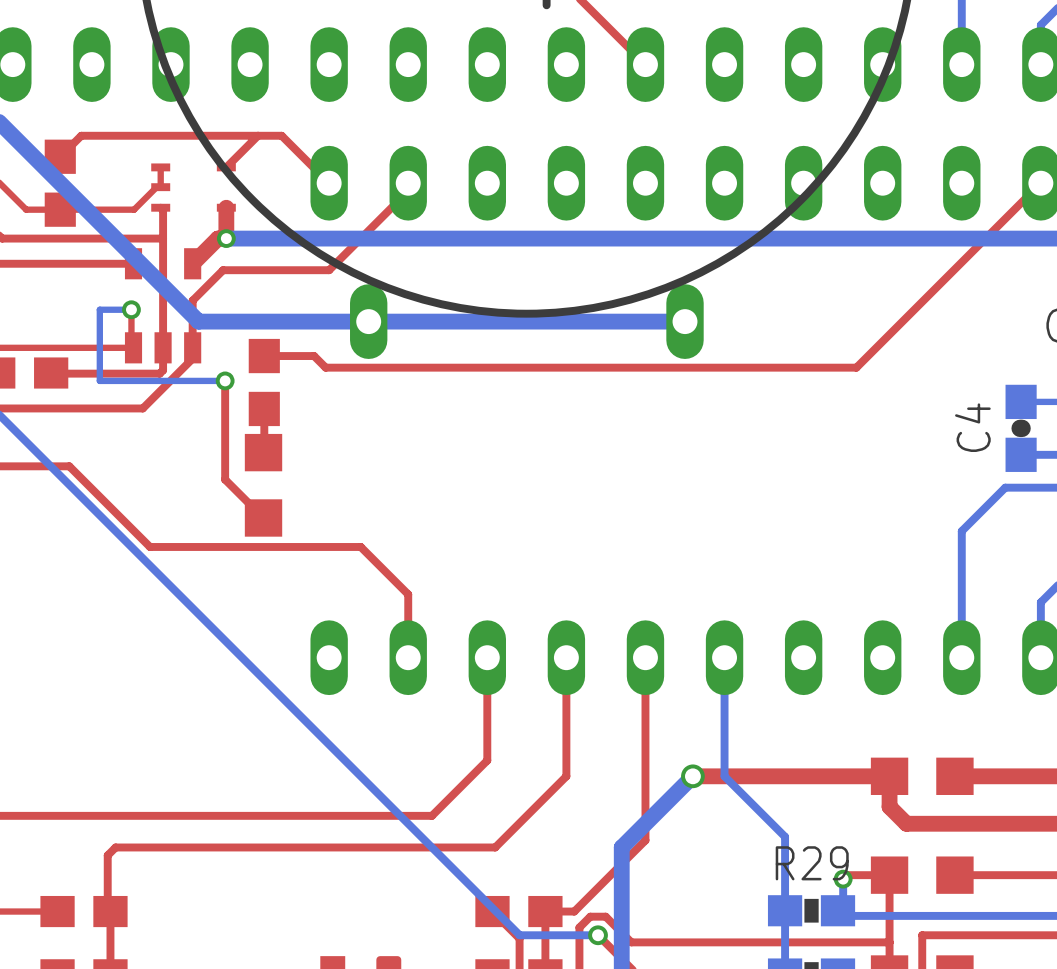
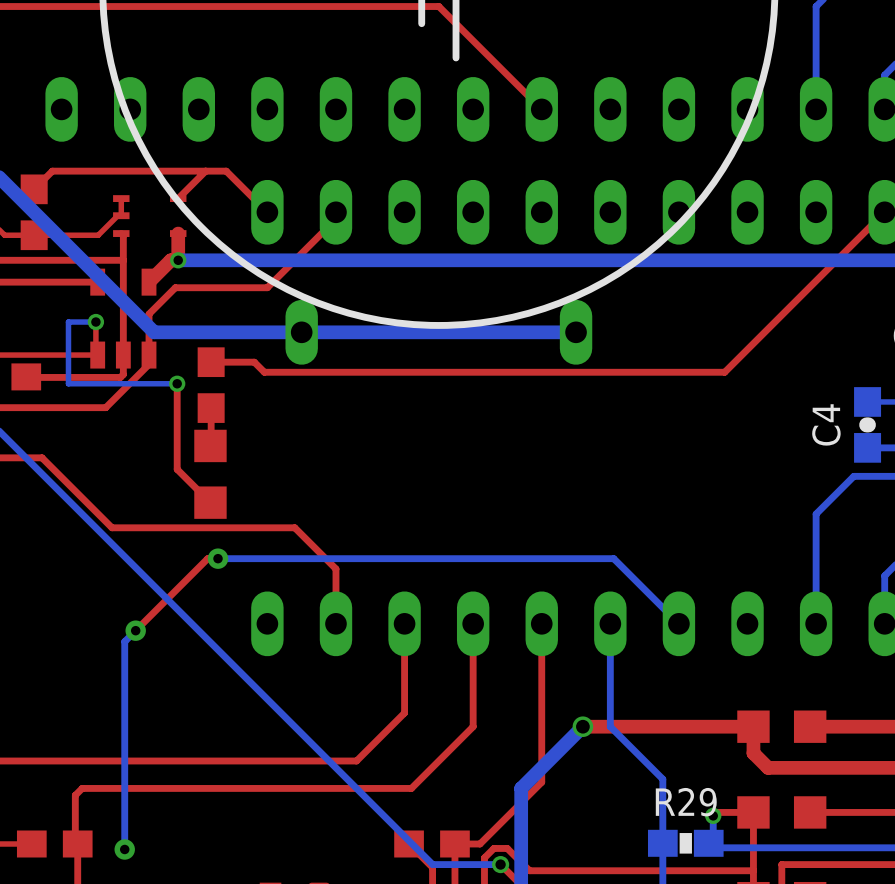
bottom track: none -> (218, 558) (613, 558) (678, 623)
top track: none -> (218, 558) (207, 558) (135, 630)
via: none -> (218, 558)
bottom track: none -> (135, 630) (124, 641) (124, 849)
via: none -> (135, 630)
via: none -> (124, 849)

